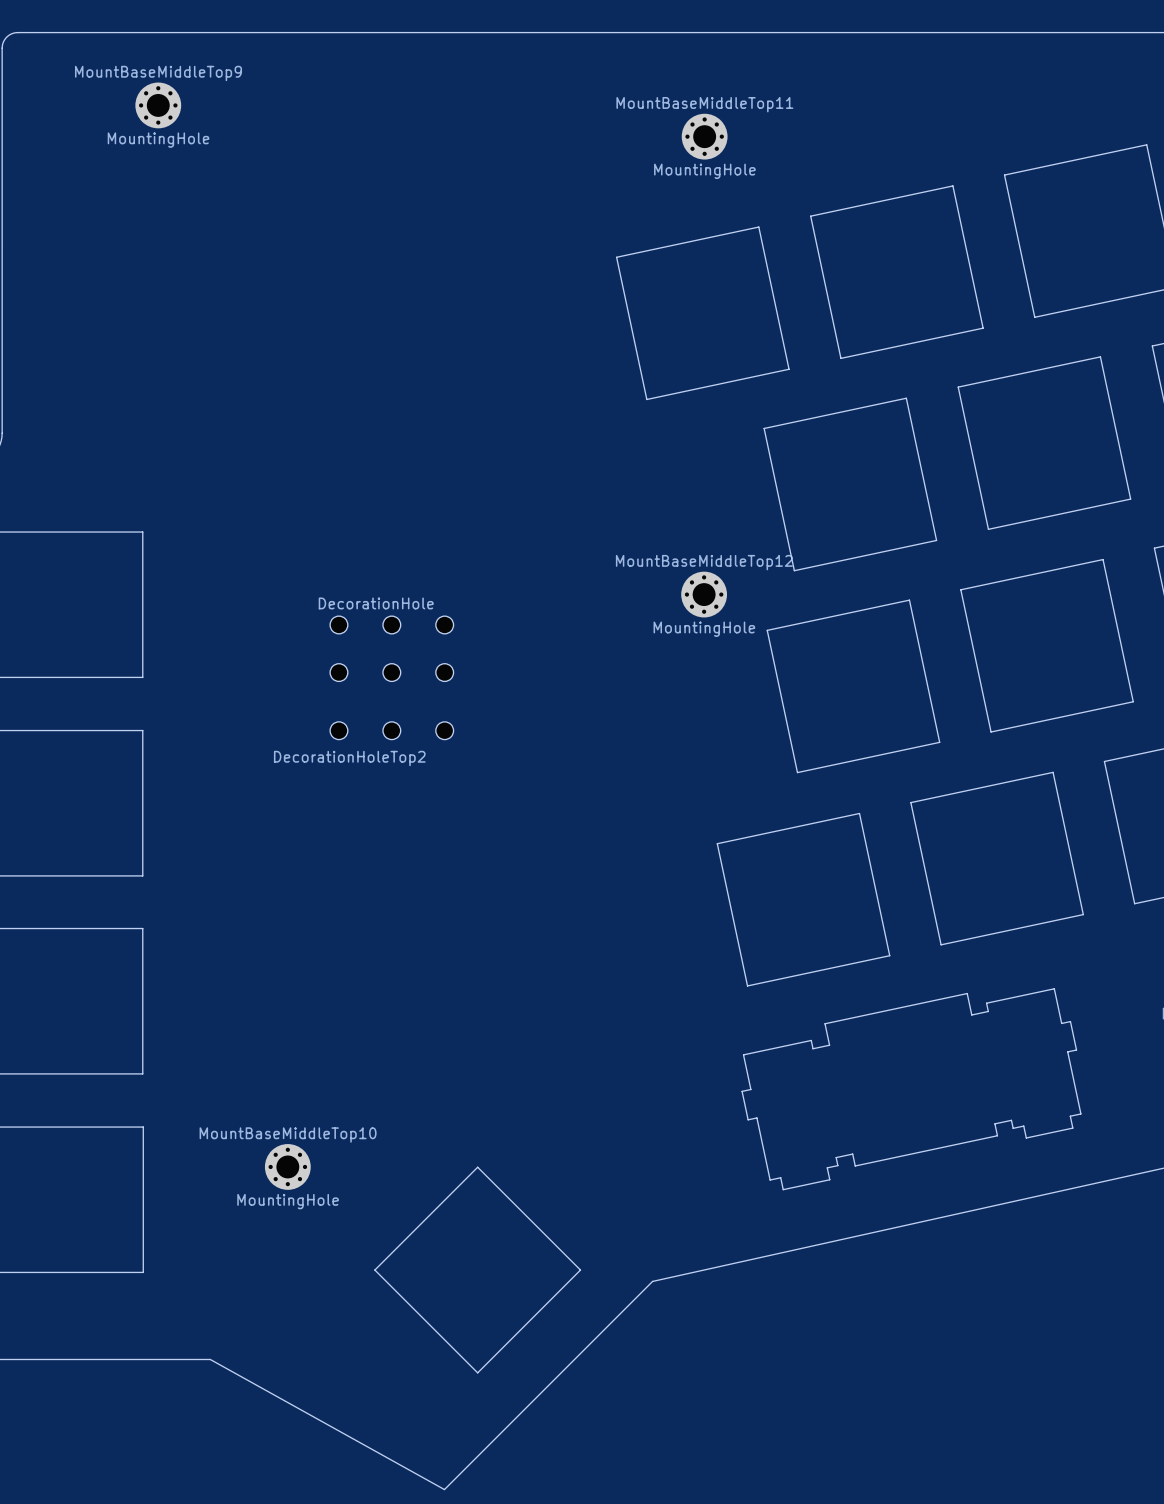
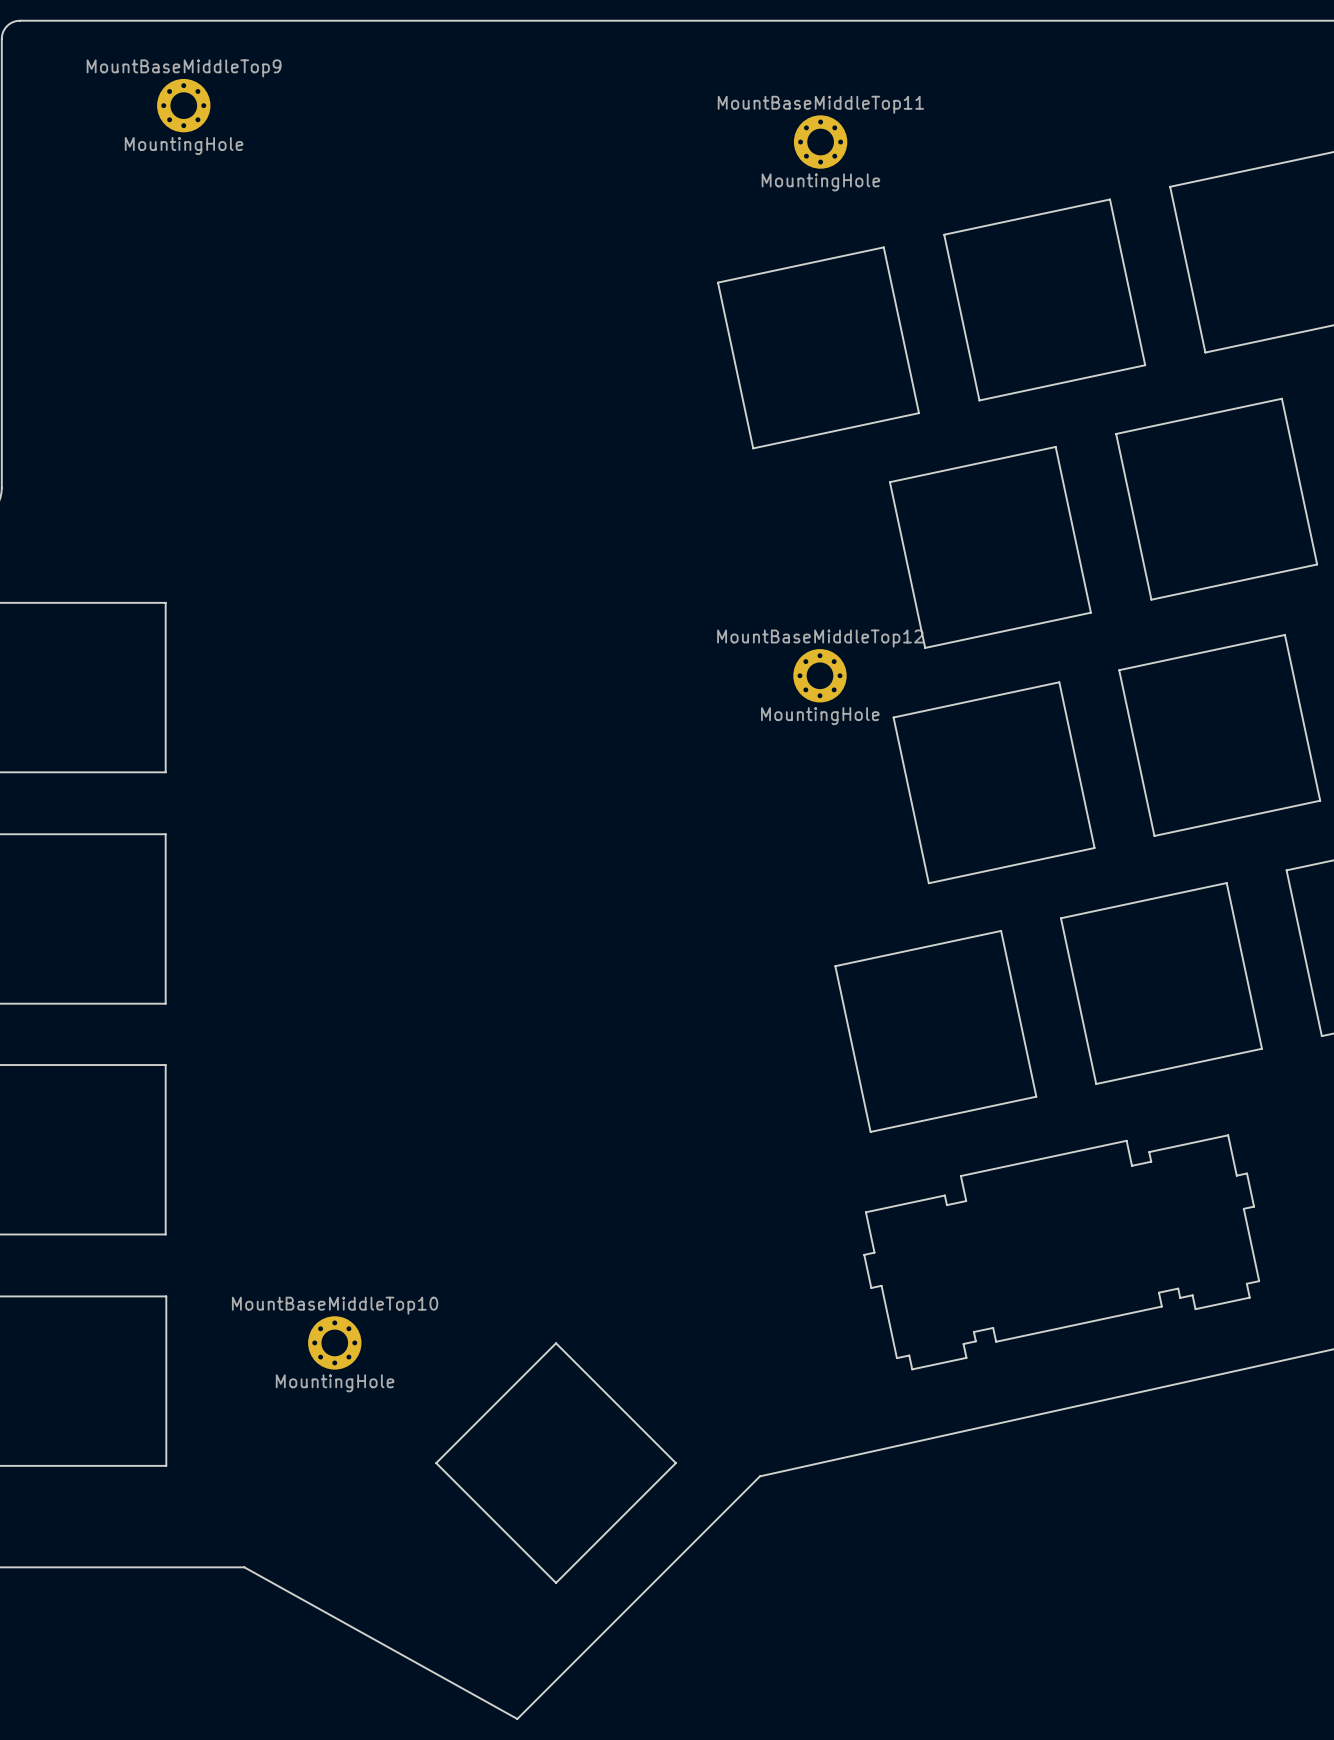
DecorationHoleTop2: DecorationHole (391, 677) -> none

